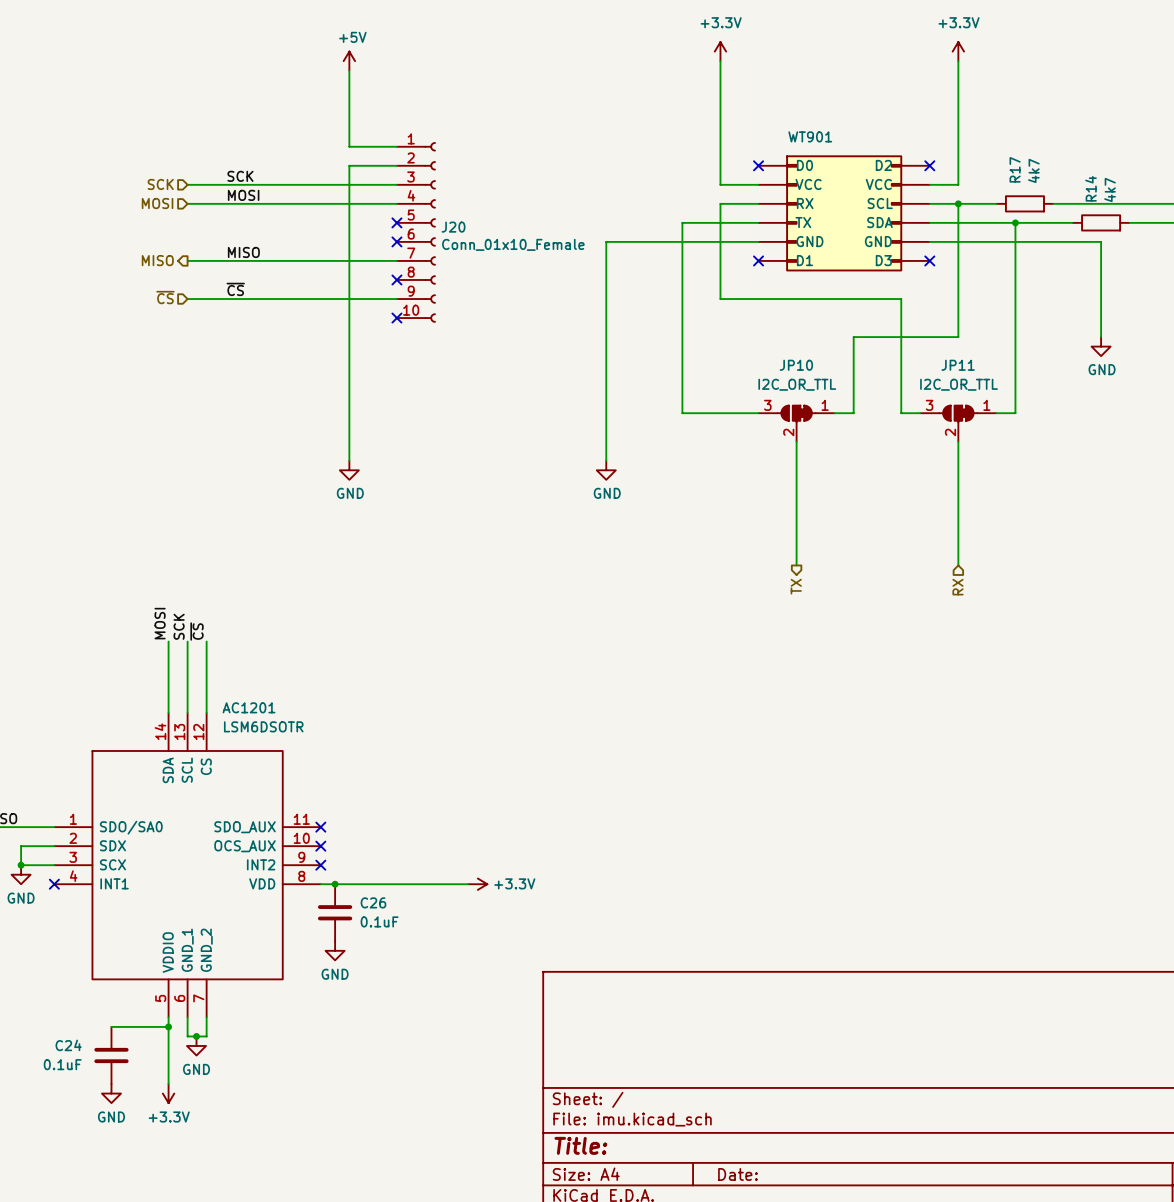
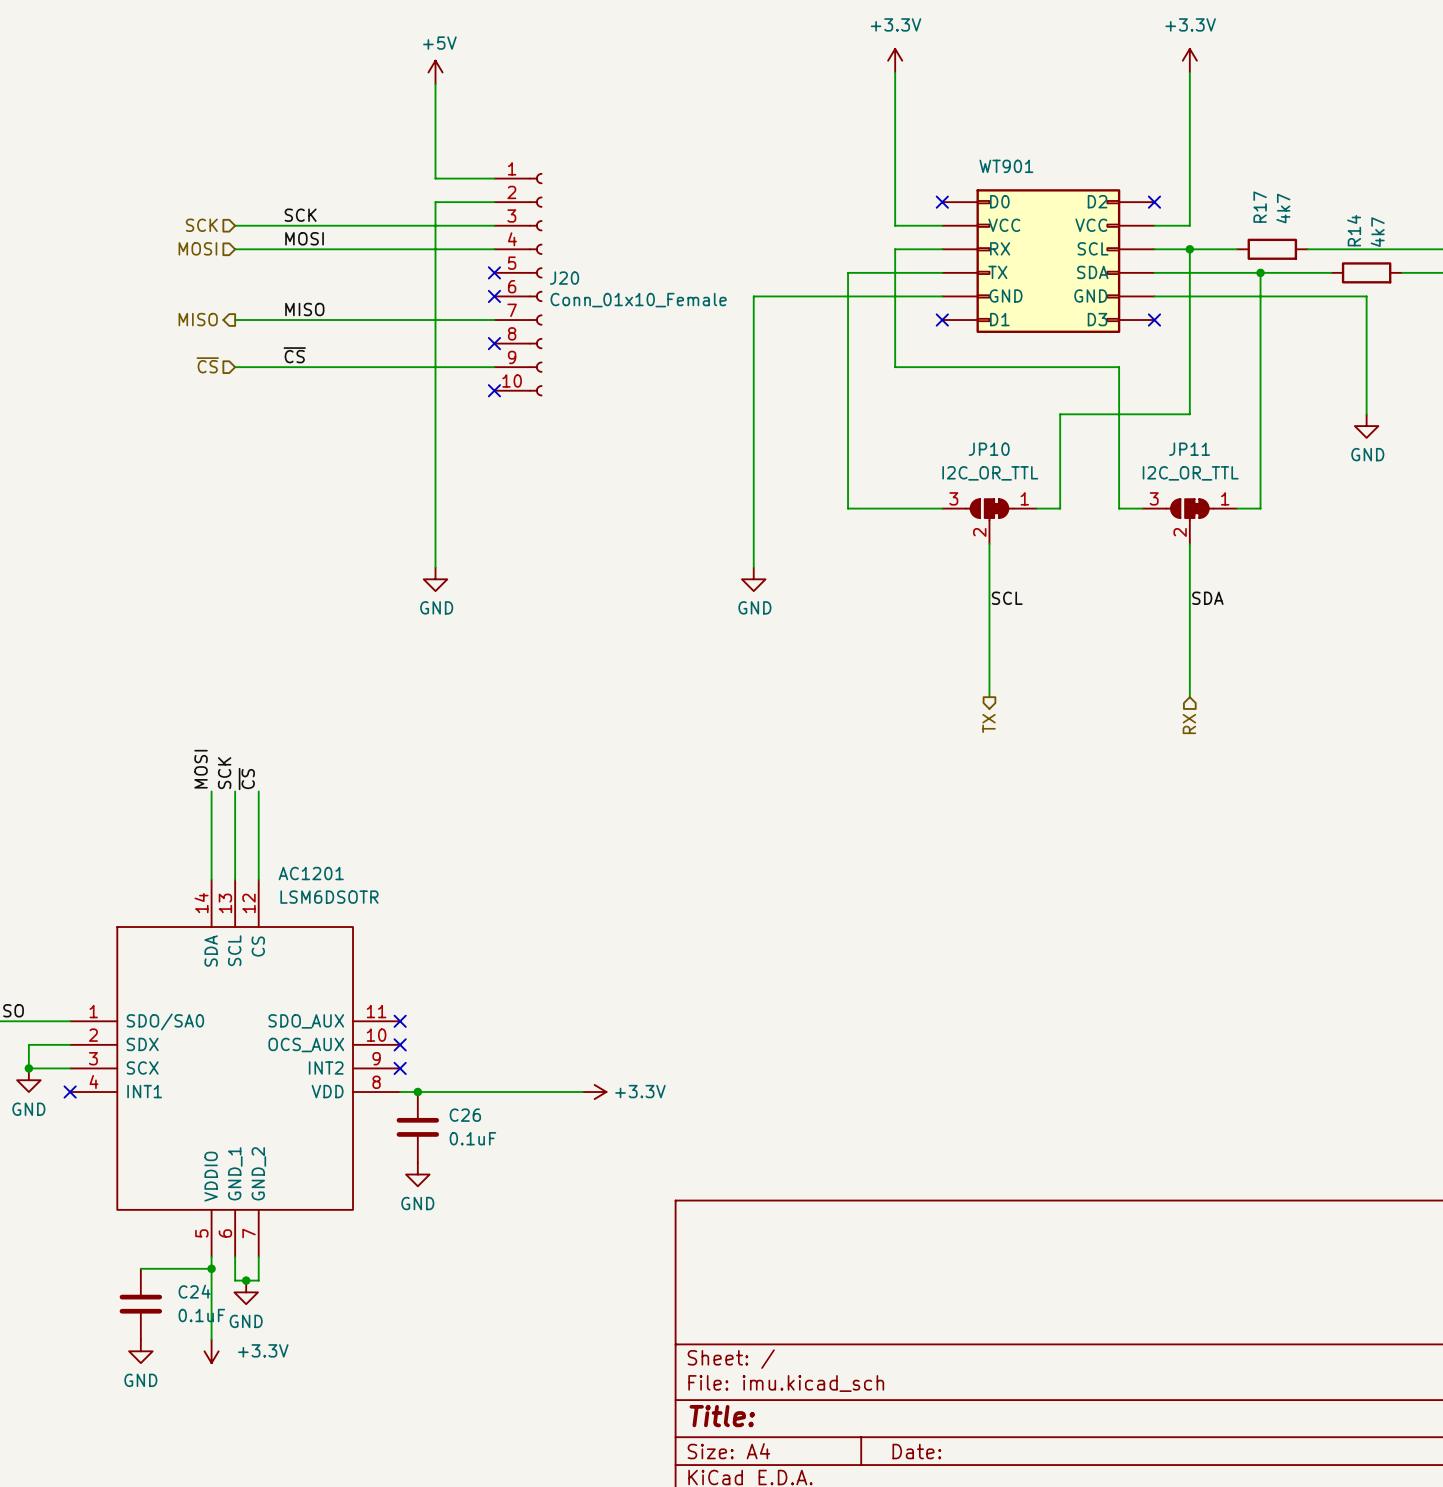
label: none -> SCL (1007, 598)
label: none -> SDA (1207, 598)
C24 name position: C24 (68, 1045) -> C24 (194, 1291)
C24 value position: 0.1uF (62, 1064) -> 0.1uF (201, 1315)
power symbol text position: +3.3V (169, 1116) -> +3.3V (263, 1350)

